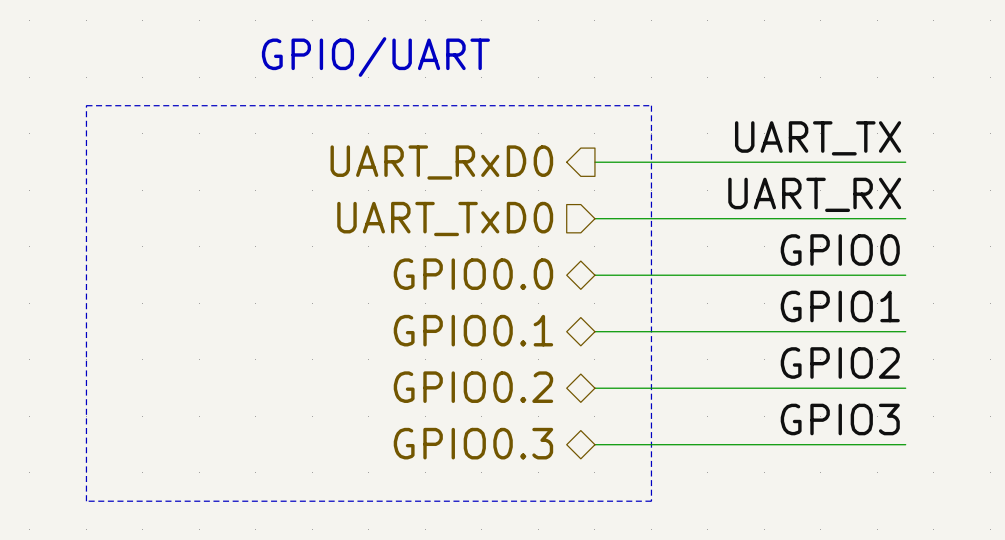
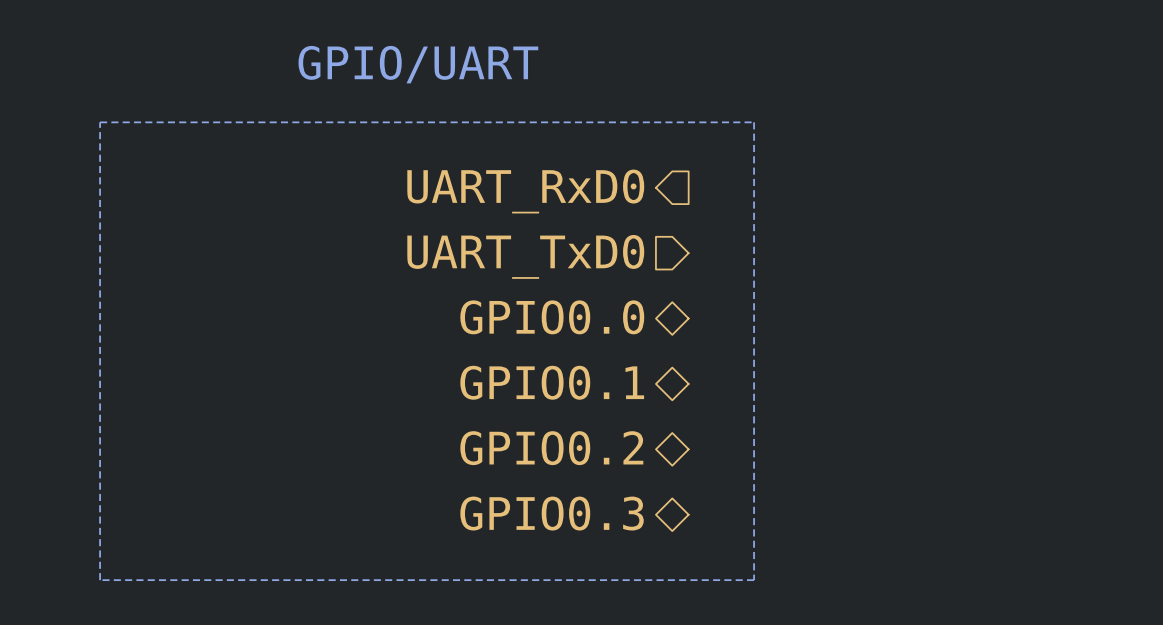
label: UART_TX (818, 138) -> none
wire: (594, 162) (905, 162) -> none
label: UART_RX (814, 194) -> none
wire: (594, 218) (905, 218) -> none
label: GPIO0 (840, 250) -> none
wire: (594, 275) (905, 275) -> none
label: GPIO1 (840, 306) -> none
wire: (594, 331) (905, 331) -> none
label: GPIO2 (840, 363) -> none
wire: (594, 388) (905, 388) -> none
label: GPIO3 (840, 419) -> none
wire: (594, 444) (905, 444) -> none

